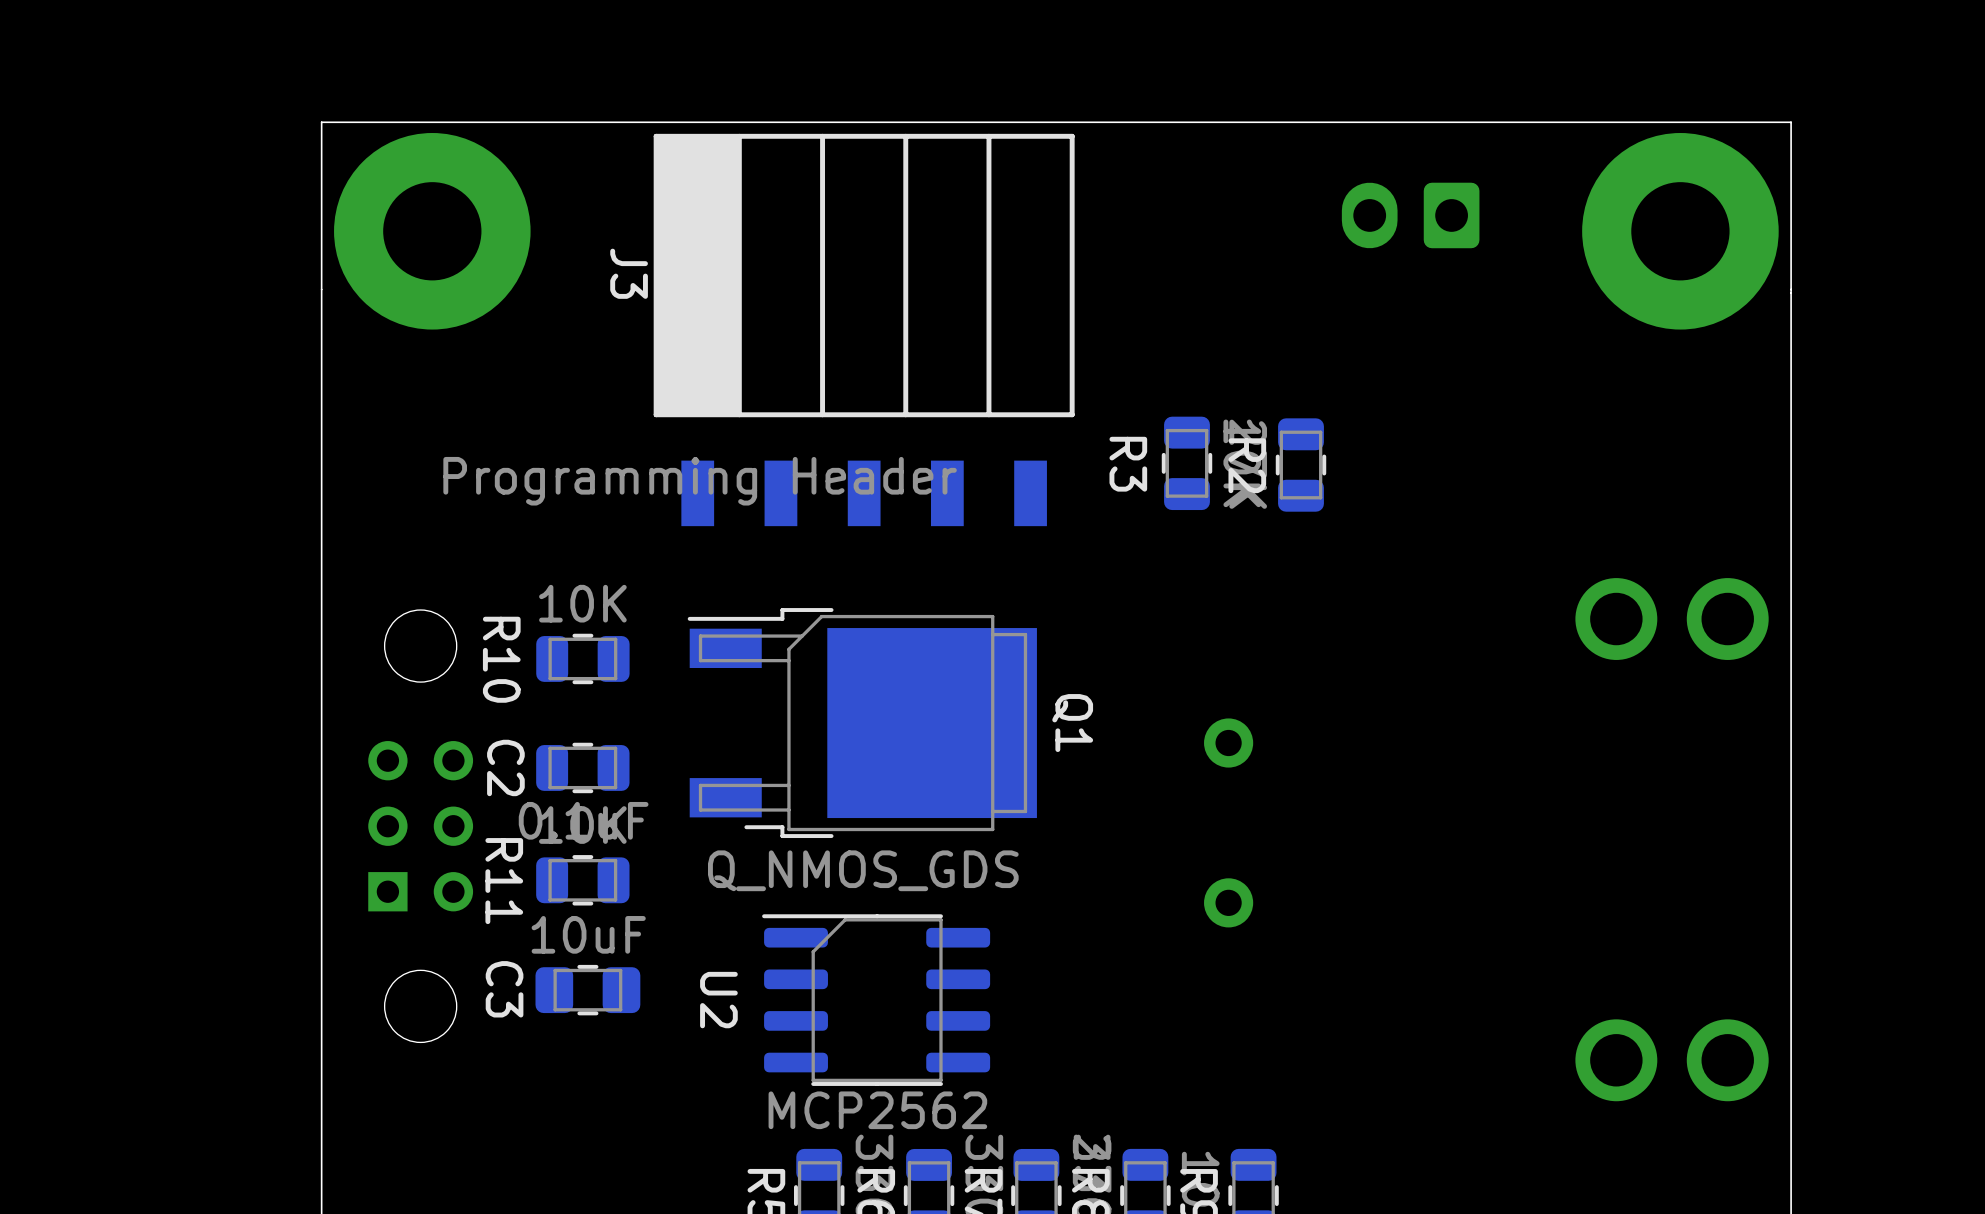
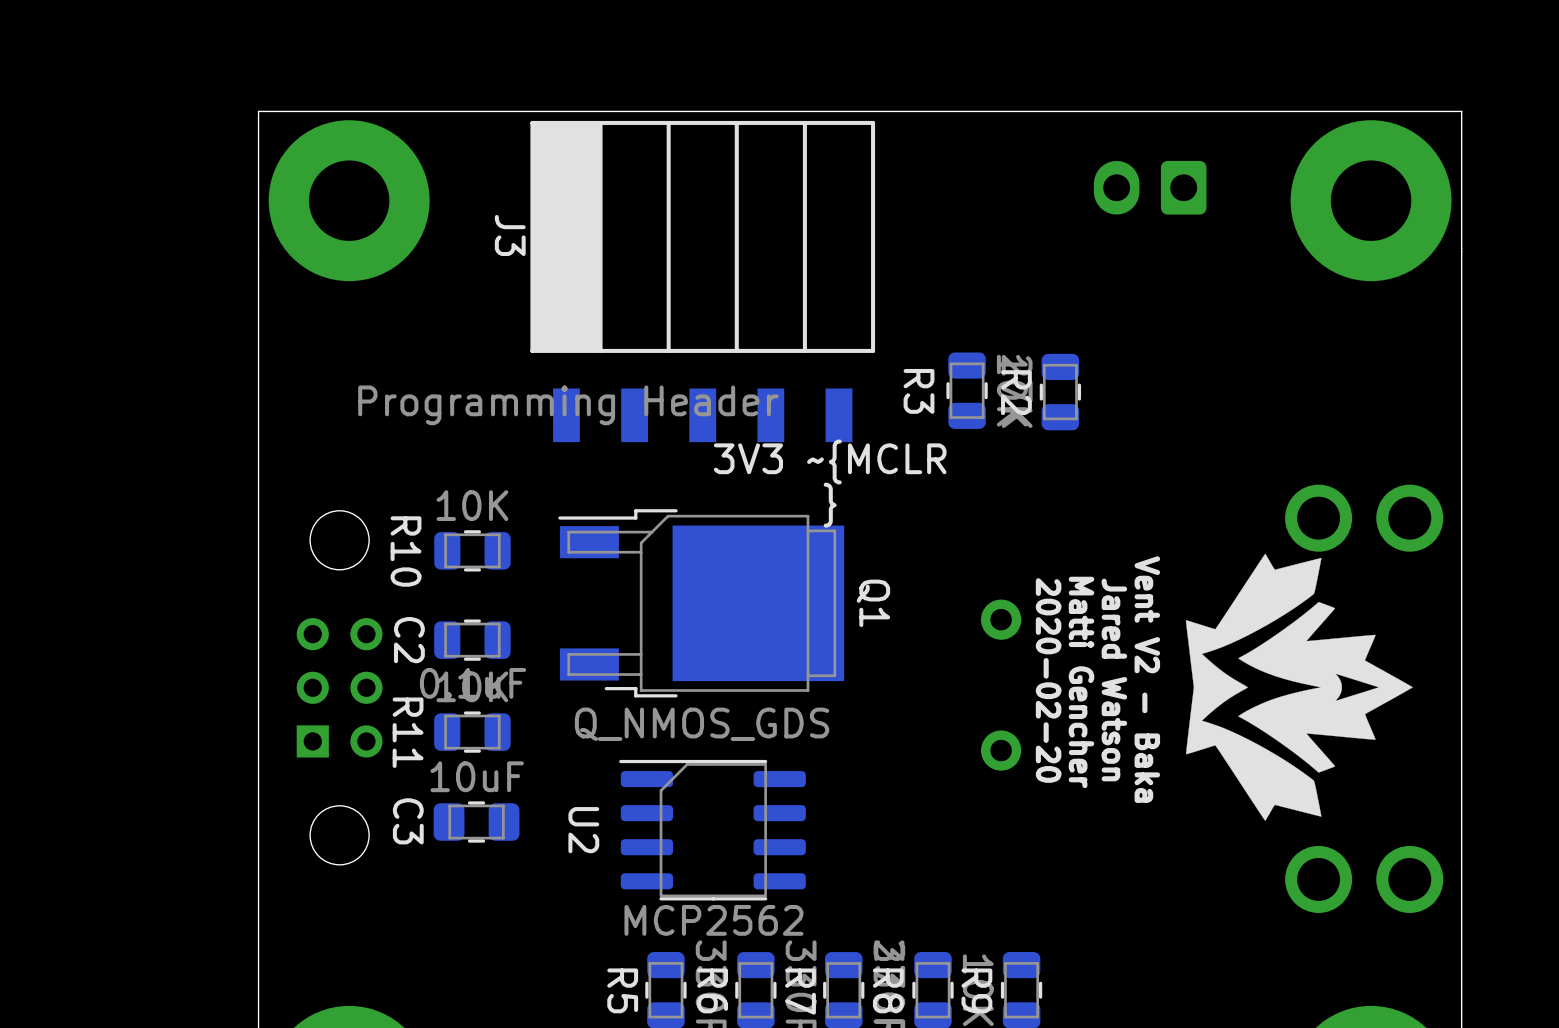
text: none -> 3V3 ~{MCLR (830, 461)
text: none -> } (830, 505)
drawing: none -> [1185, 553, 1413, 821]
text: none -> Jared Watson (1114, 680)
text: none -> Vent V2 - Baka (1147, 679)
text: none -> 2020-02-20 (1048, 680)
text: none -> Matti Gencher (1081, 682)

